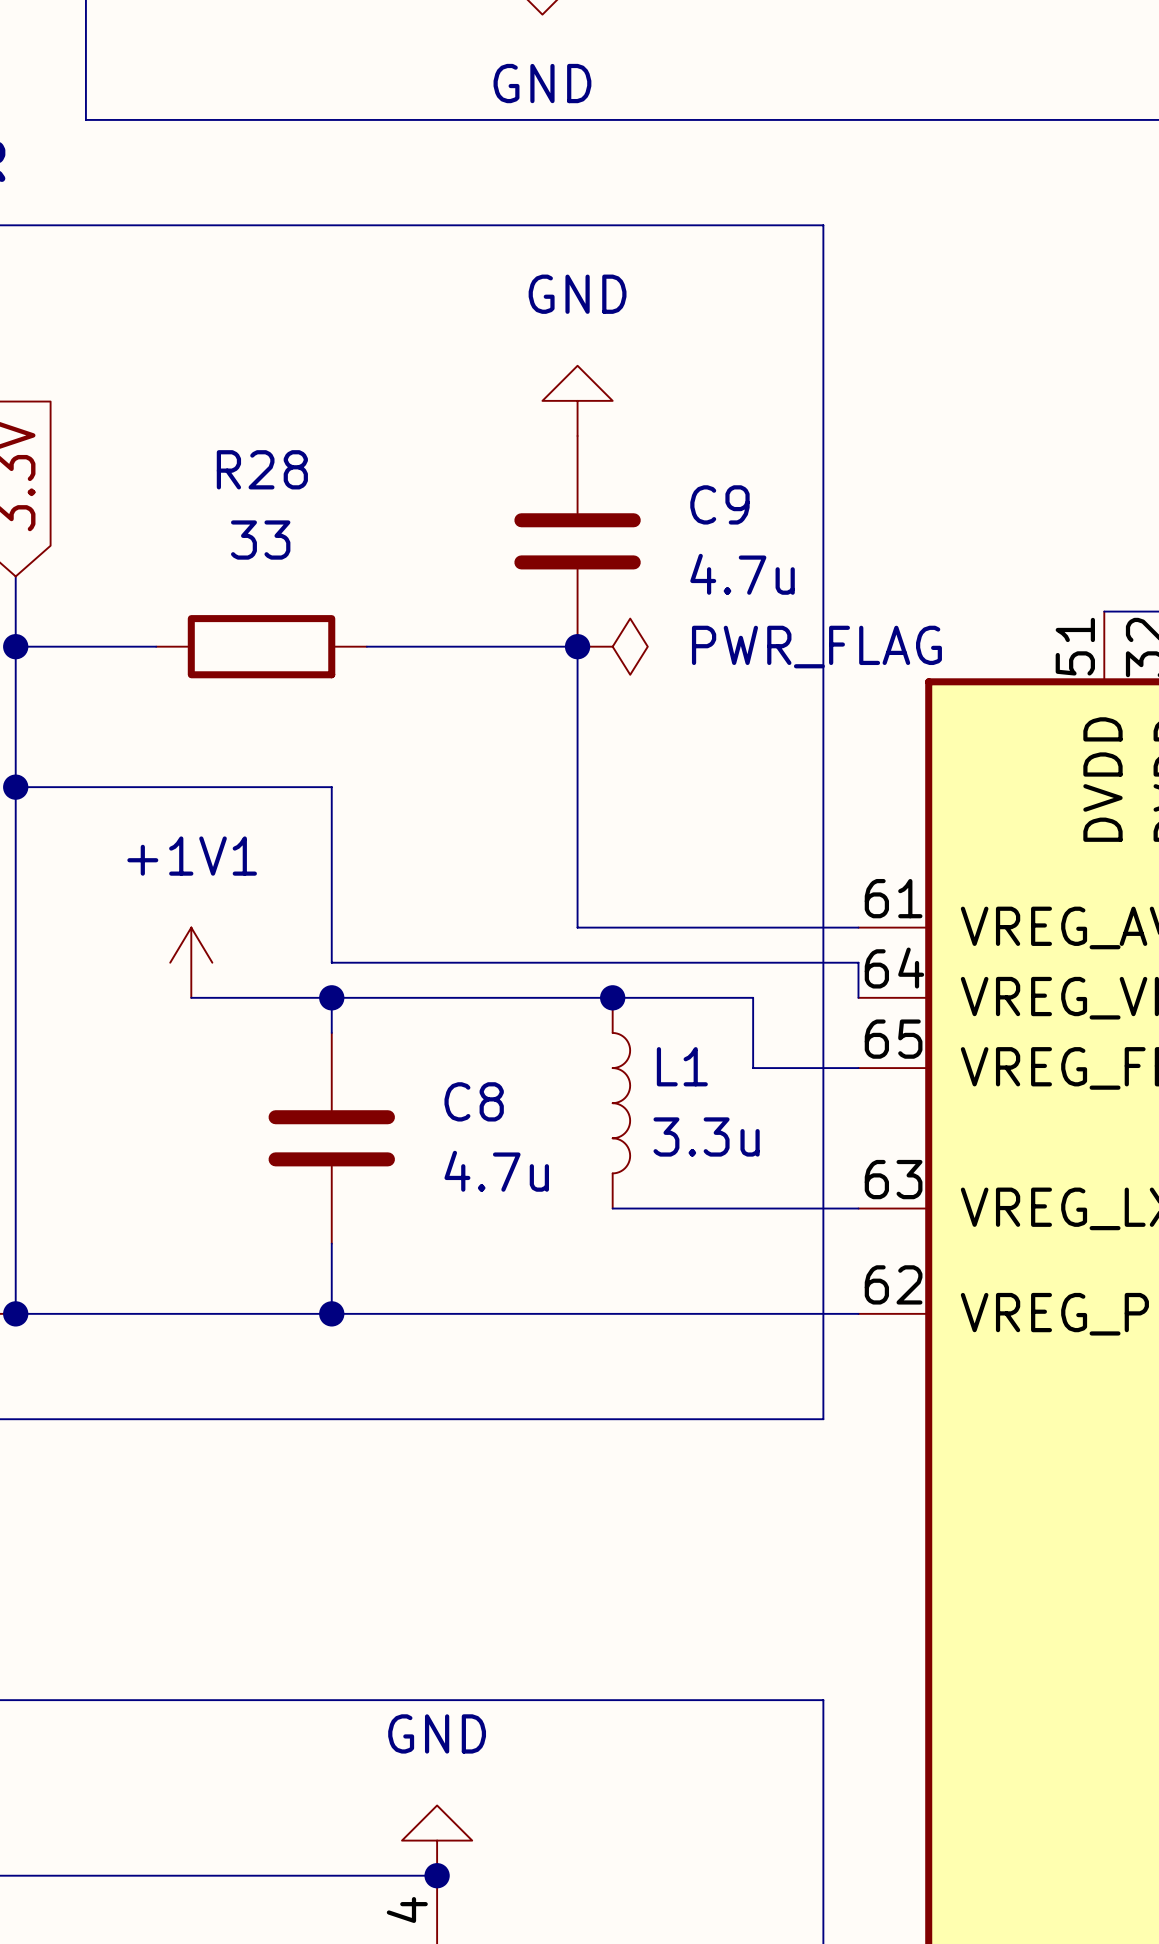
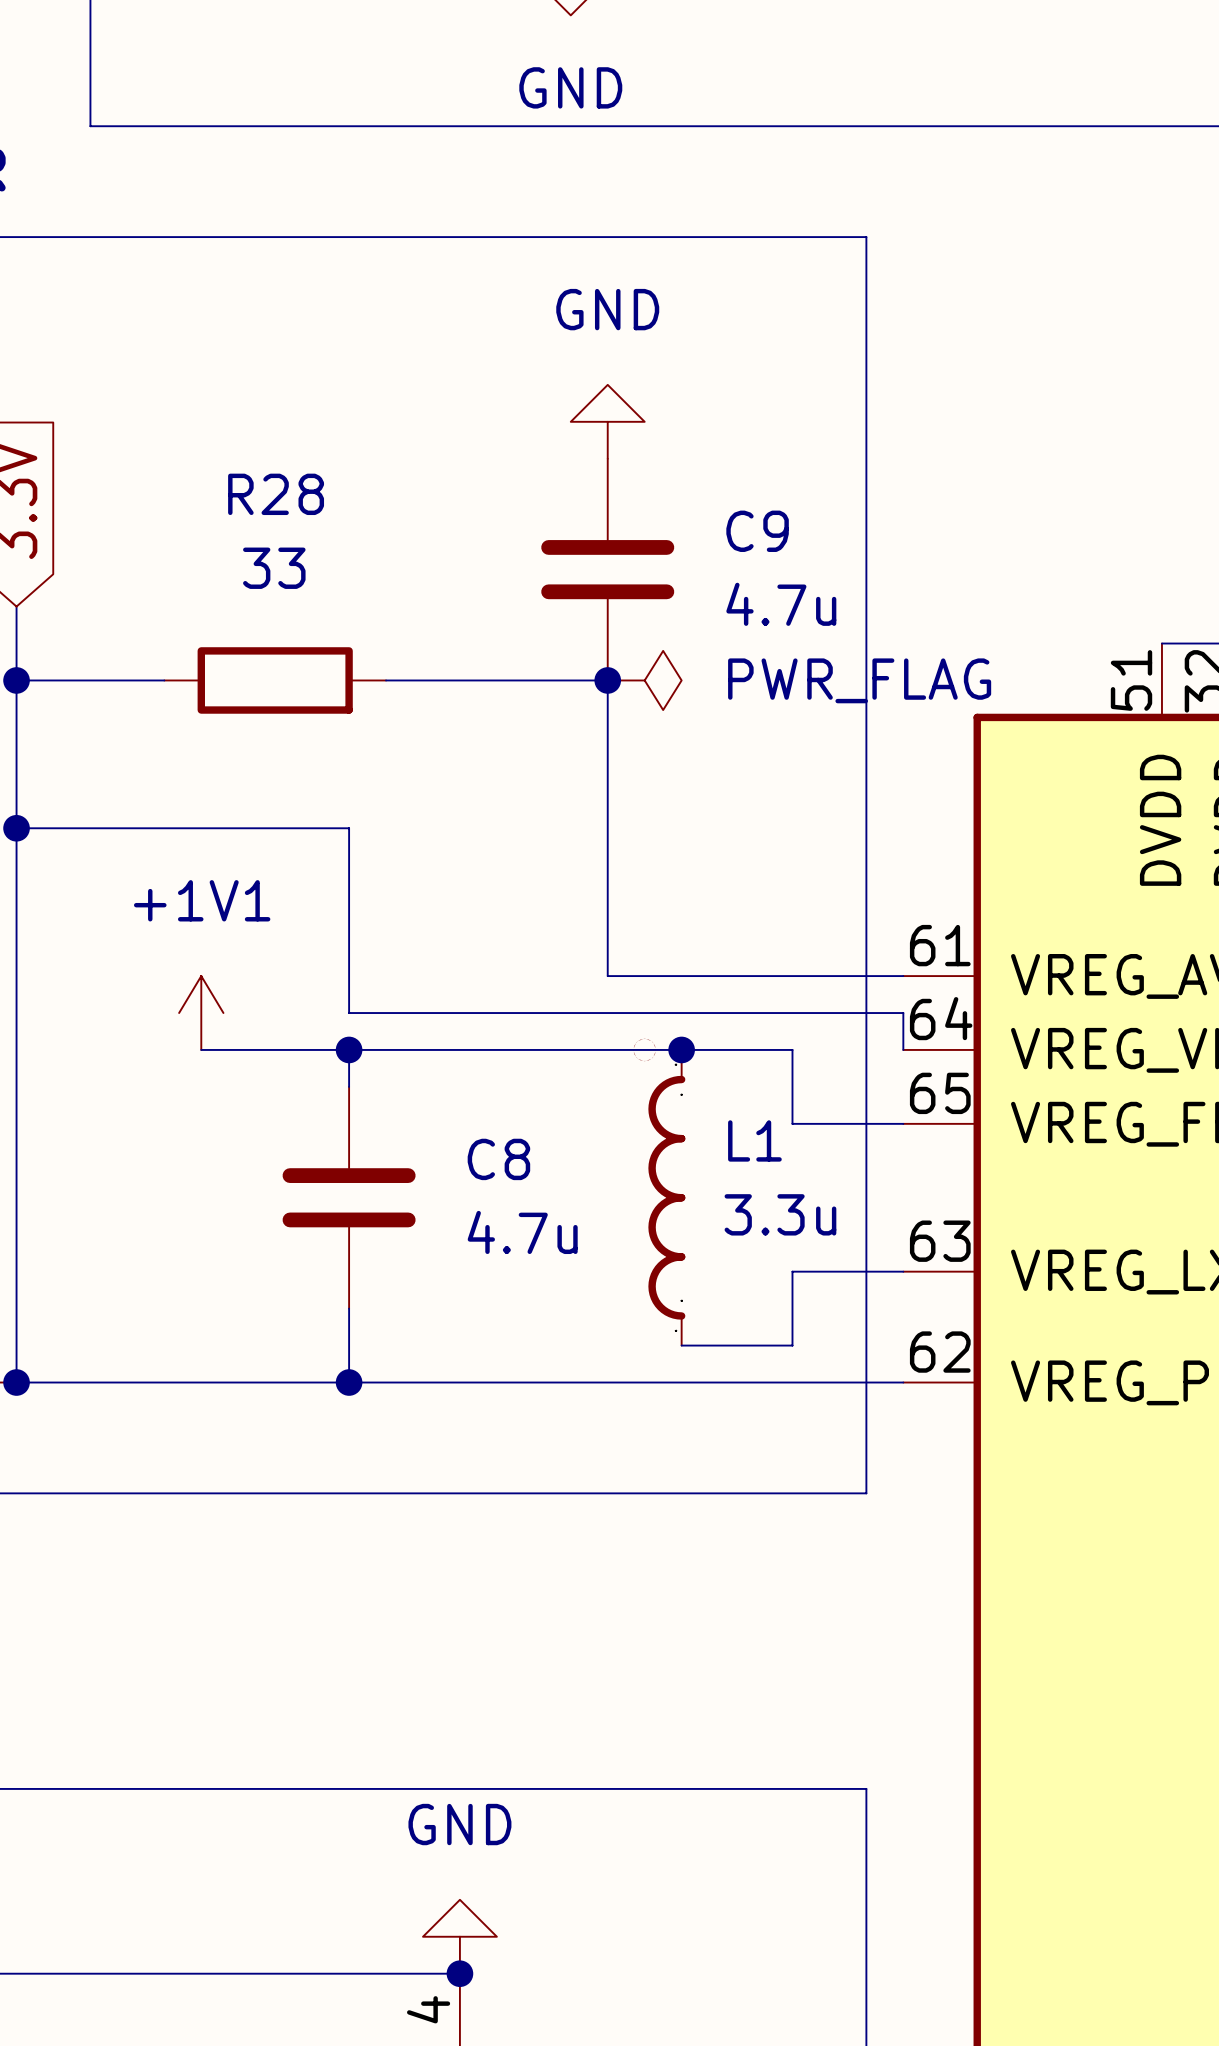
junction position: (612, 997) -> (681, 1049)
L1 symbol: [612, 997, 631, 1209] -> [633, 1038, 686, 1346]
wire: (612, 1208) (753, 1208) -> (681, 1345) (792, 1345) (792, 1271)

